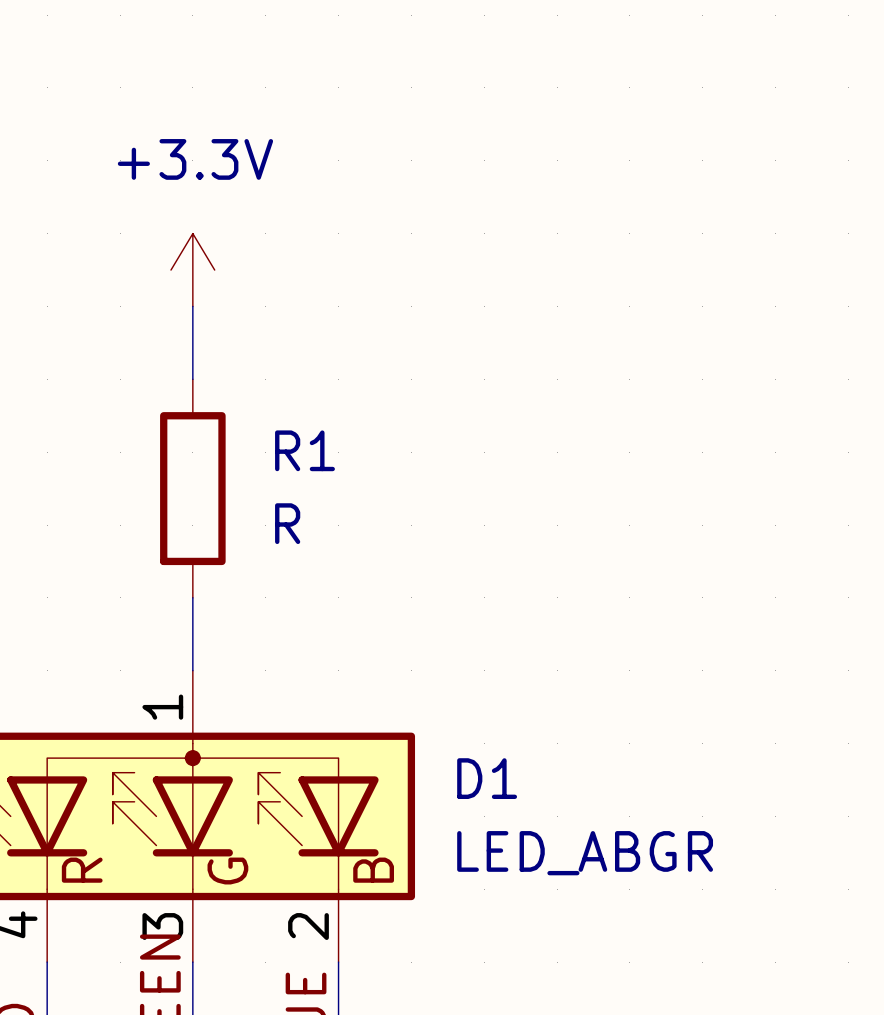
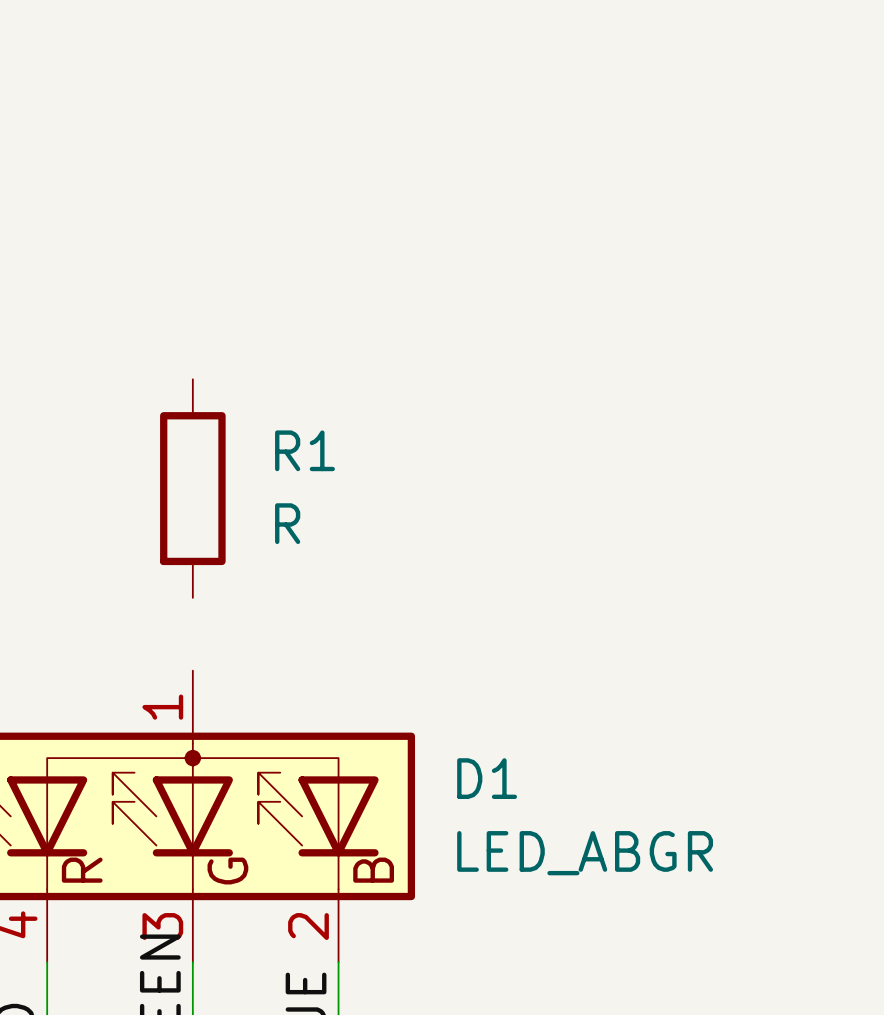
power symbol: +3.3V (192, 270) -> none
wire: (192, 306) (192, 379) -> none
wire: (192, 597) (192, 670) -> none

